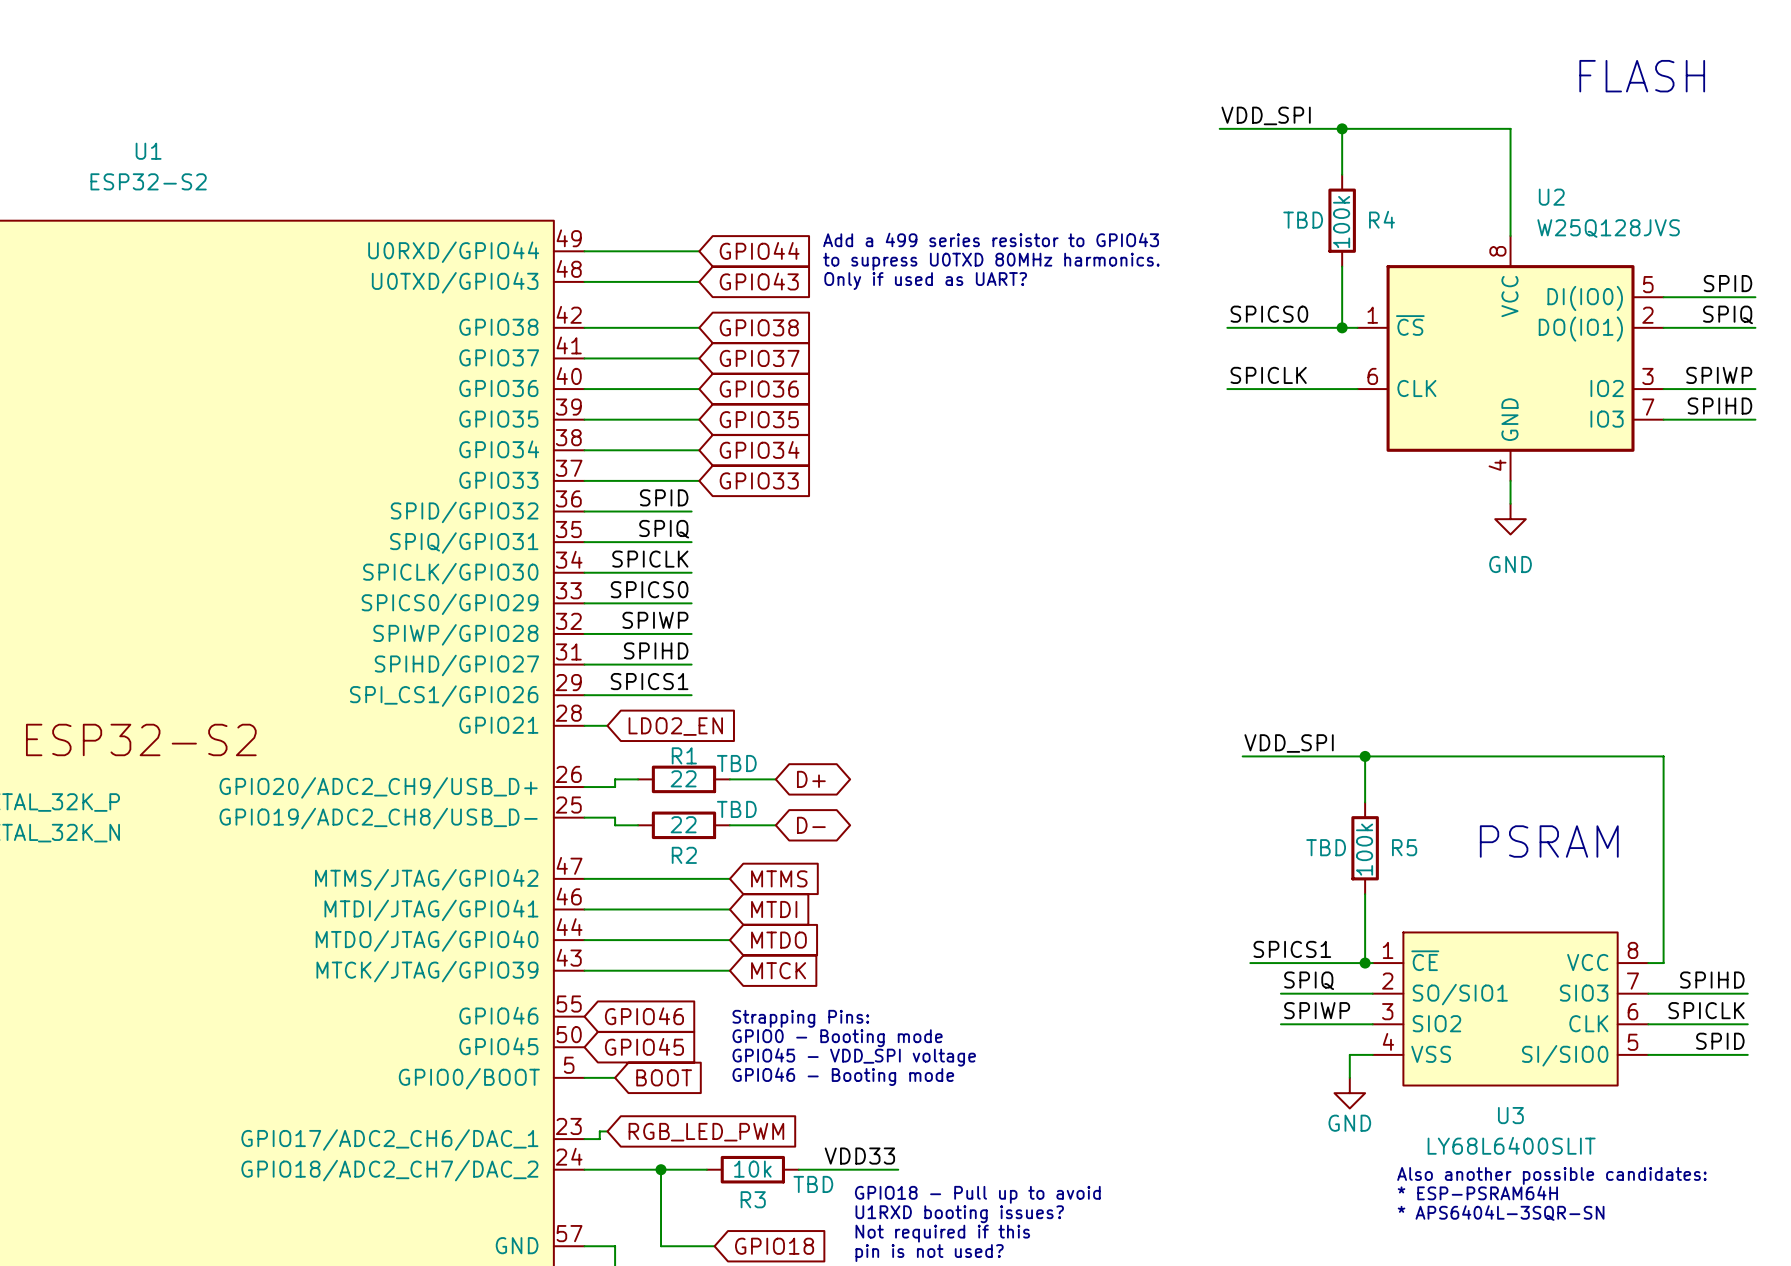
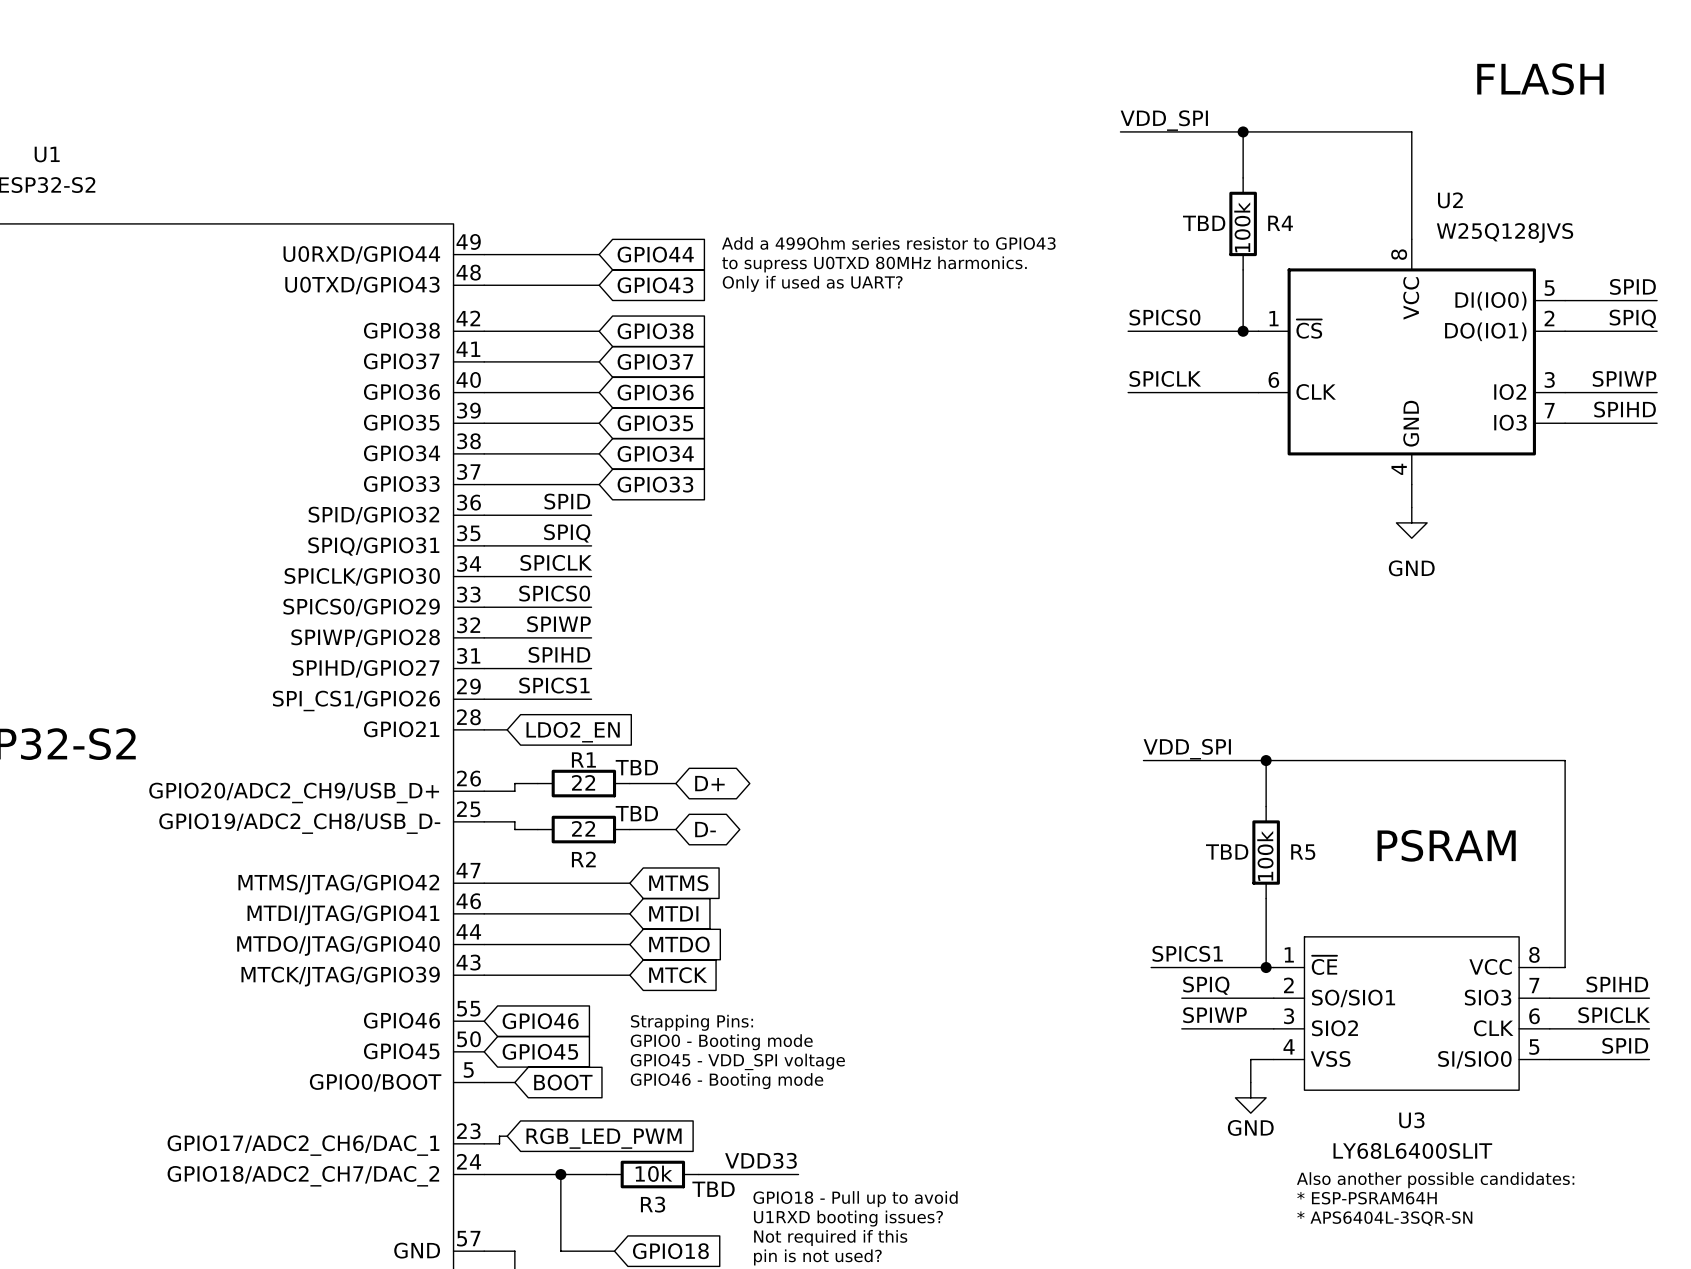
text: Add a 499 series resistor to GPIO43 (991, 239) -> Add a 499Ohm series resistor to GPIO43 (888, 243)

